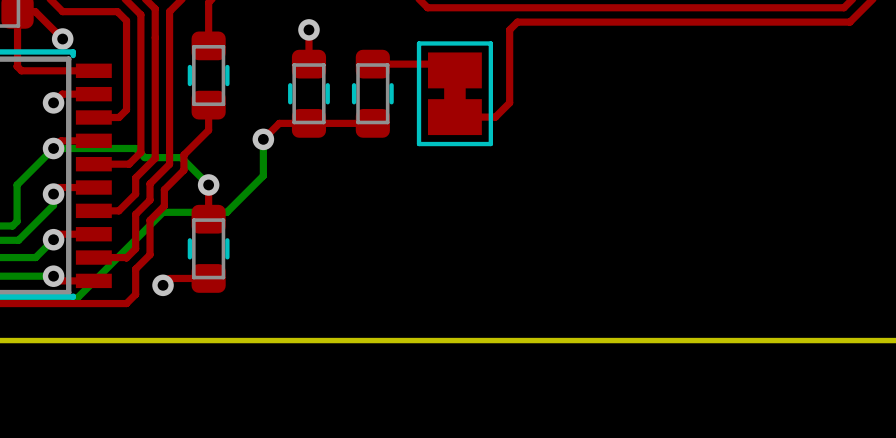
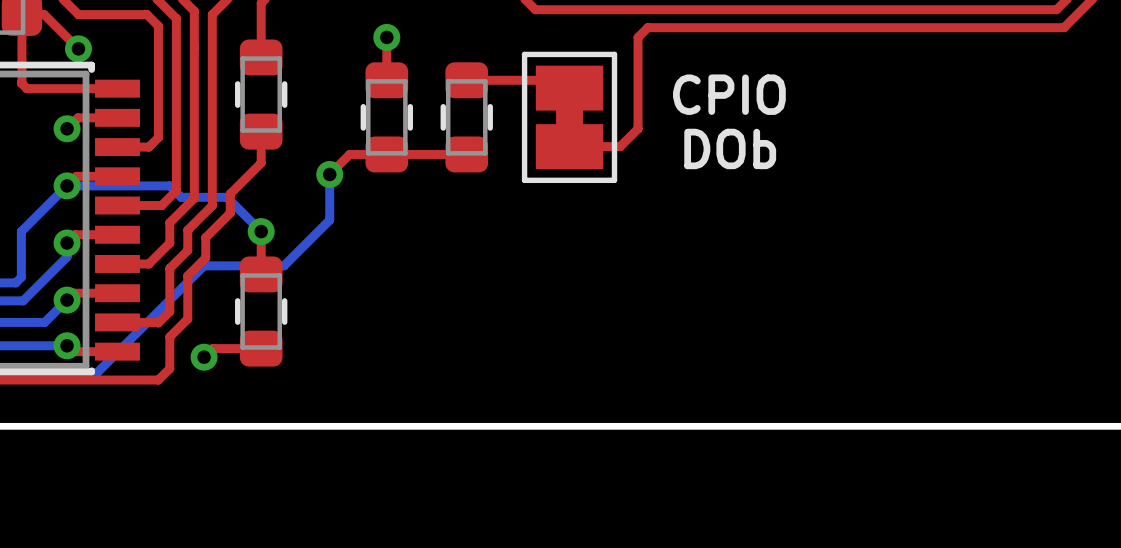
text: none -> CPIO (729, 94)
text: none -> DOb (730, 148)

